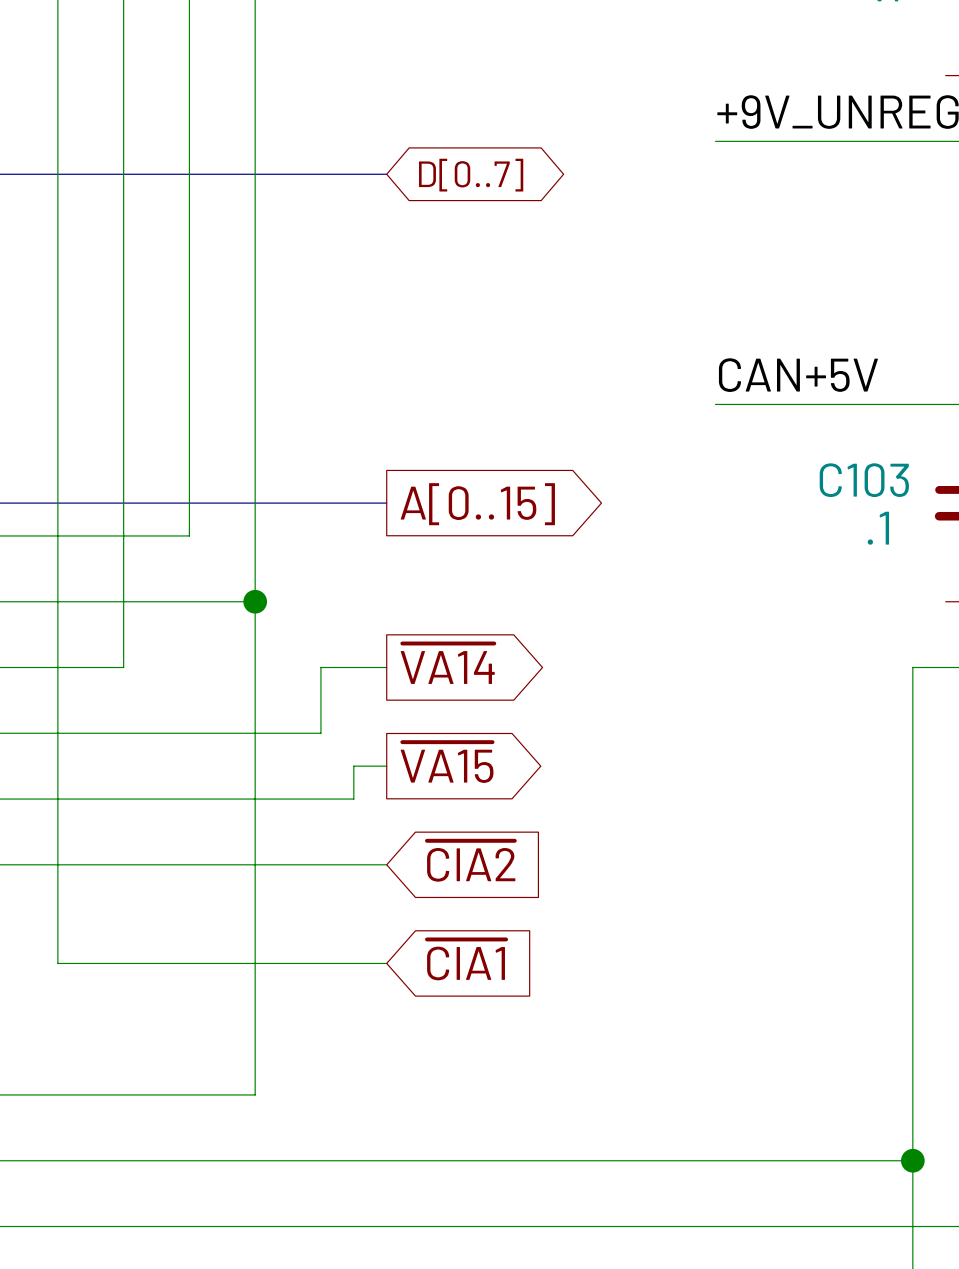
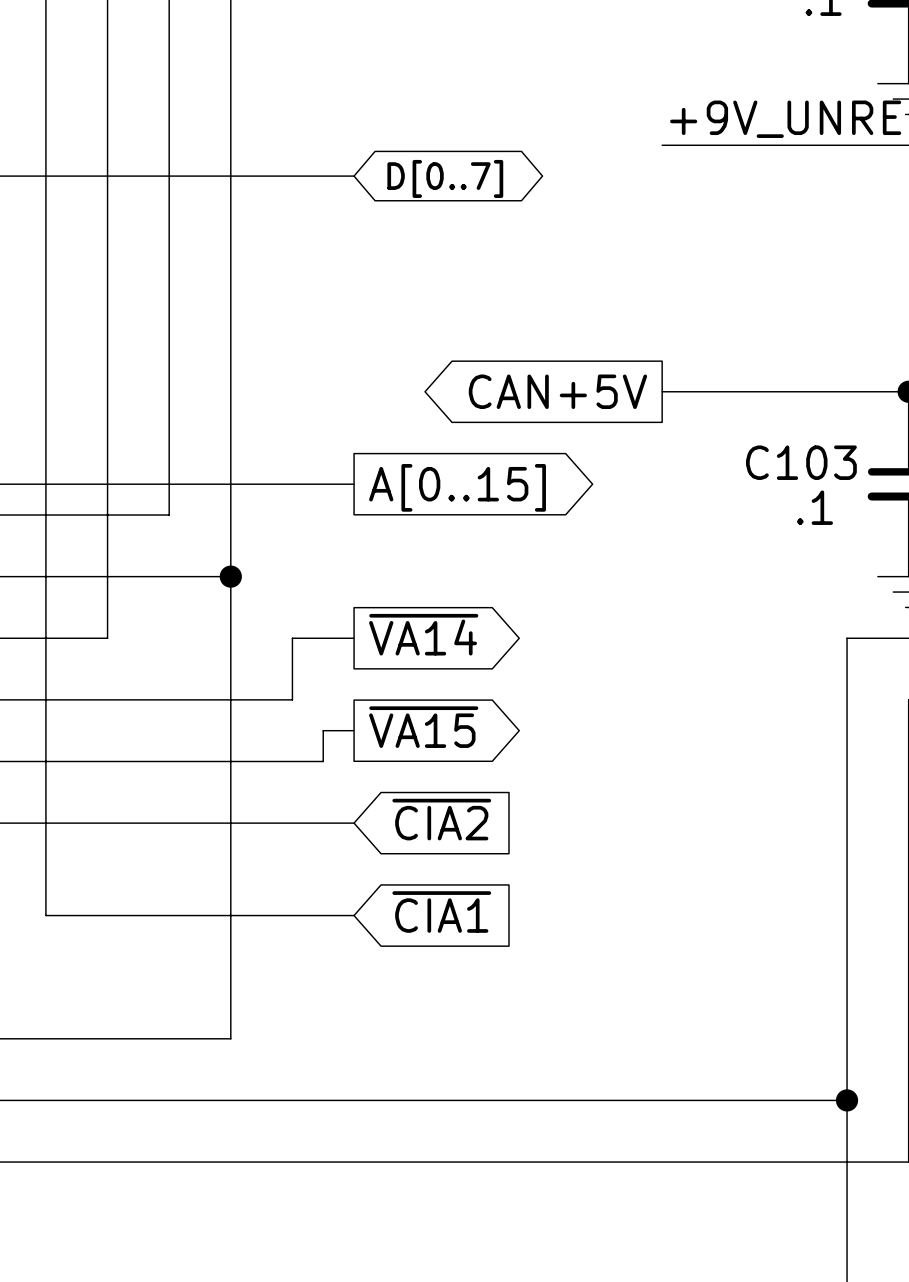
label: CAN+5V (798, 375) -> none
global label: none -> CAN+5V (557, 391)

